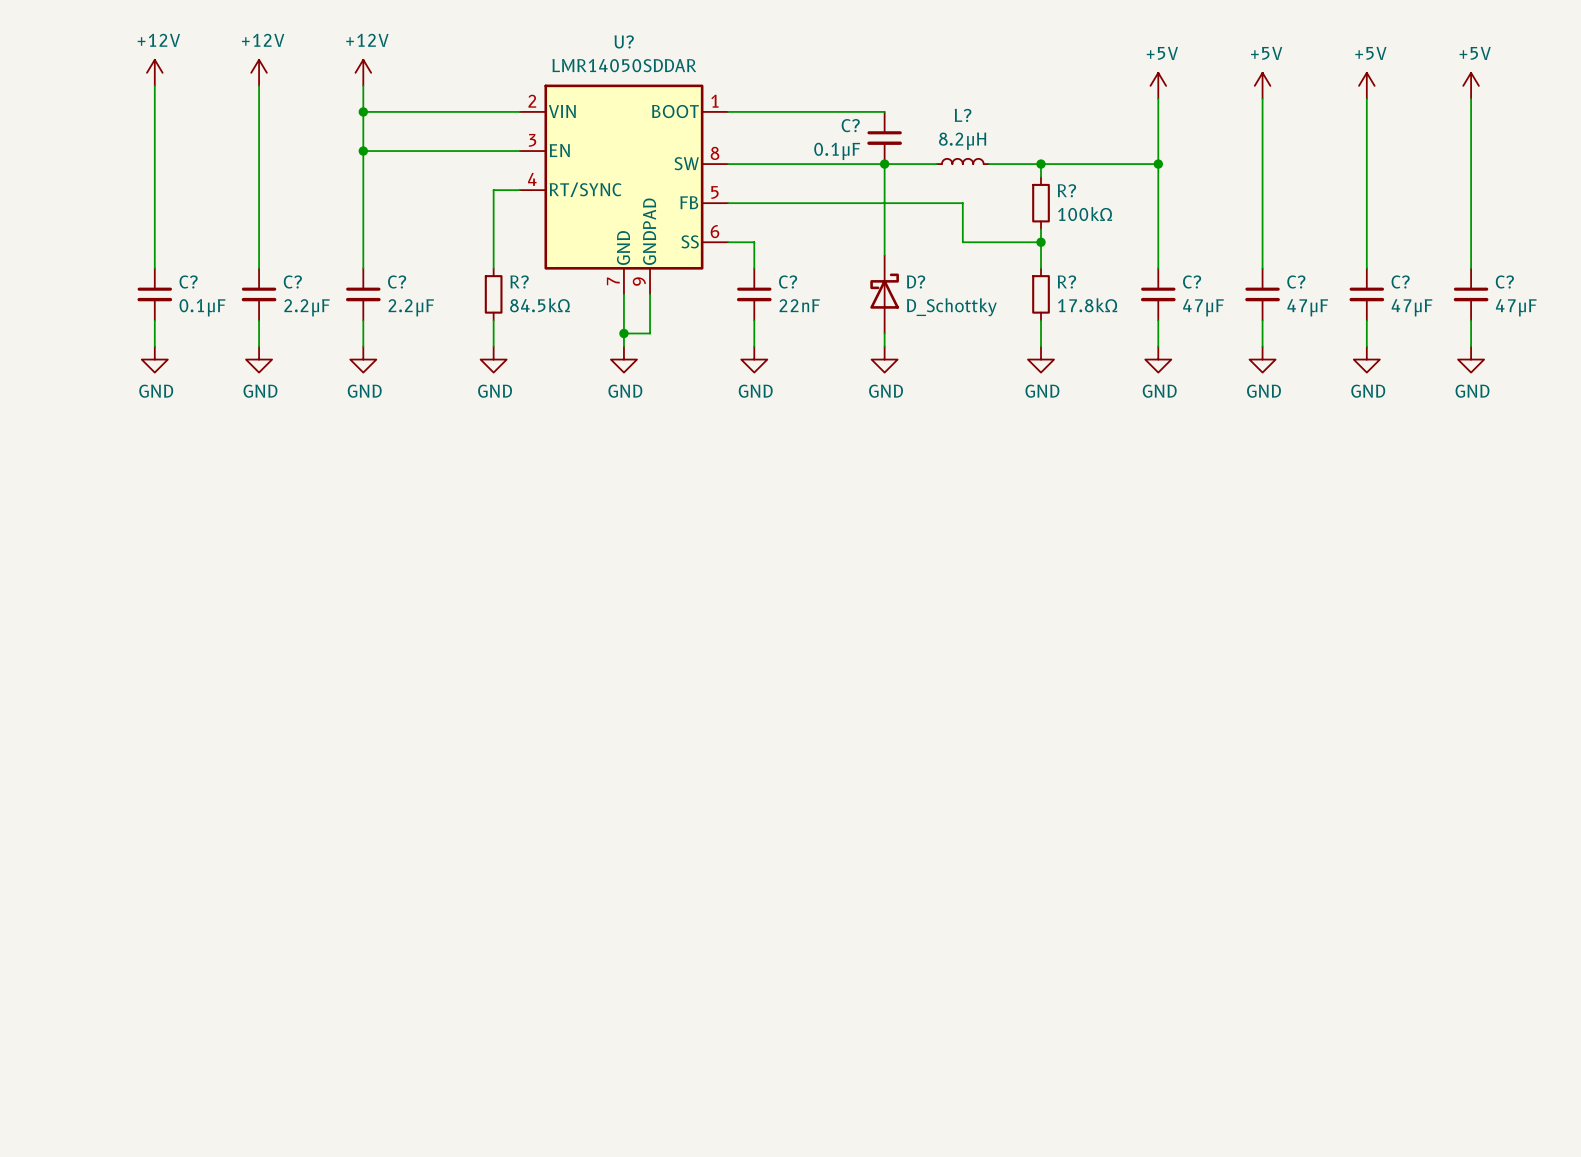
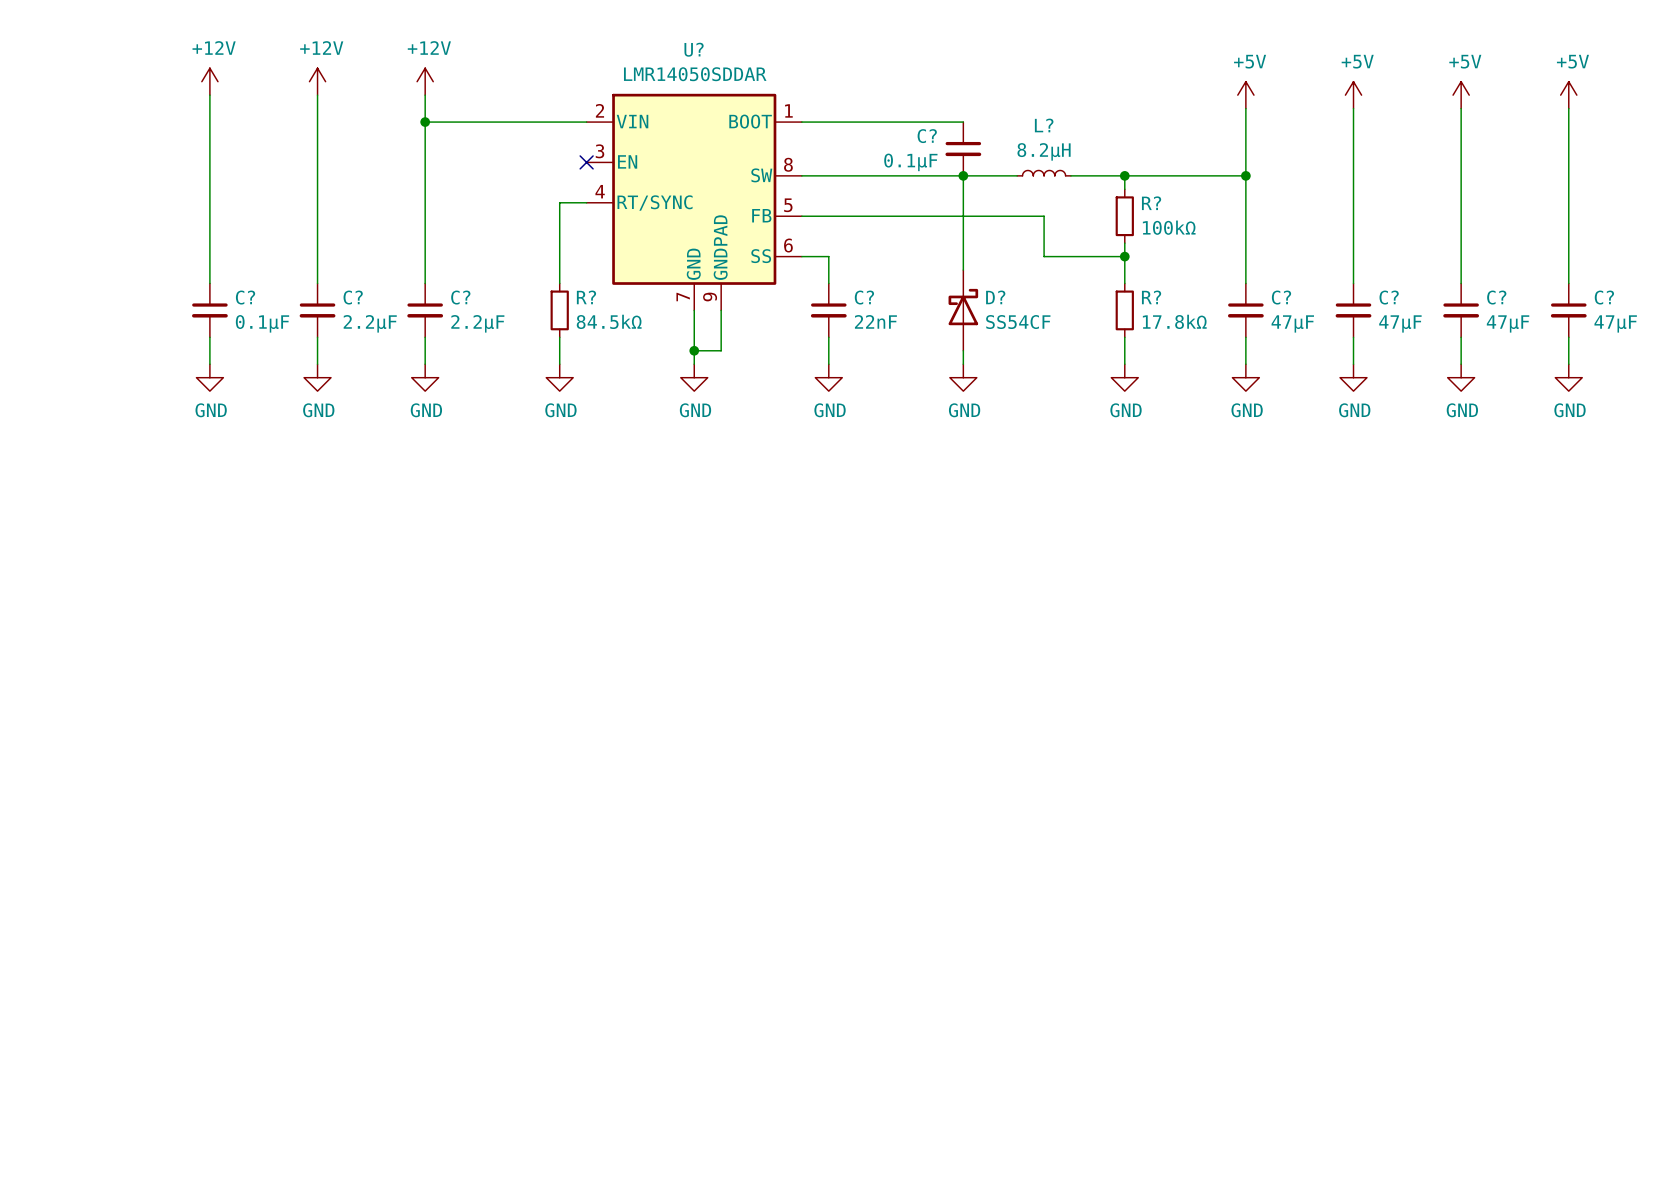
wire: (363, 151) (519, 151) -> none
junction: (363, 151) -> none
no-connect mark: none -> (586, 162)
D? value: D_Schottky (951, 307) -> SS54CF (1018, 322)

